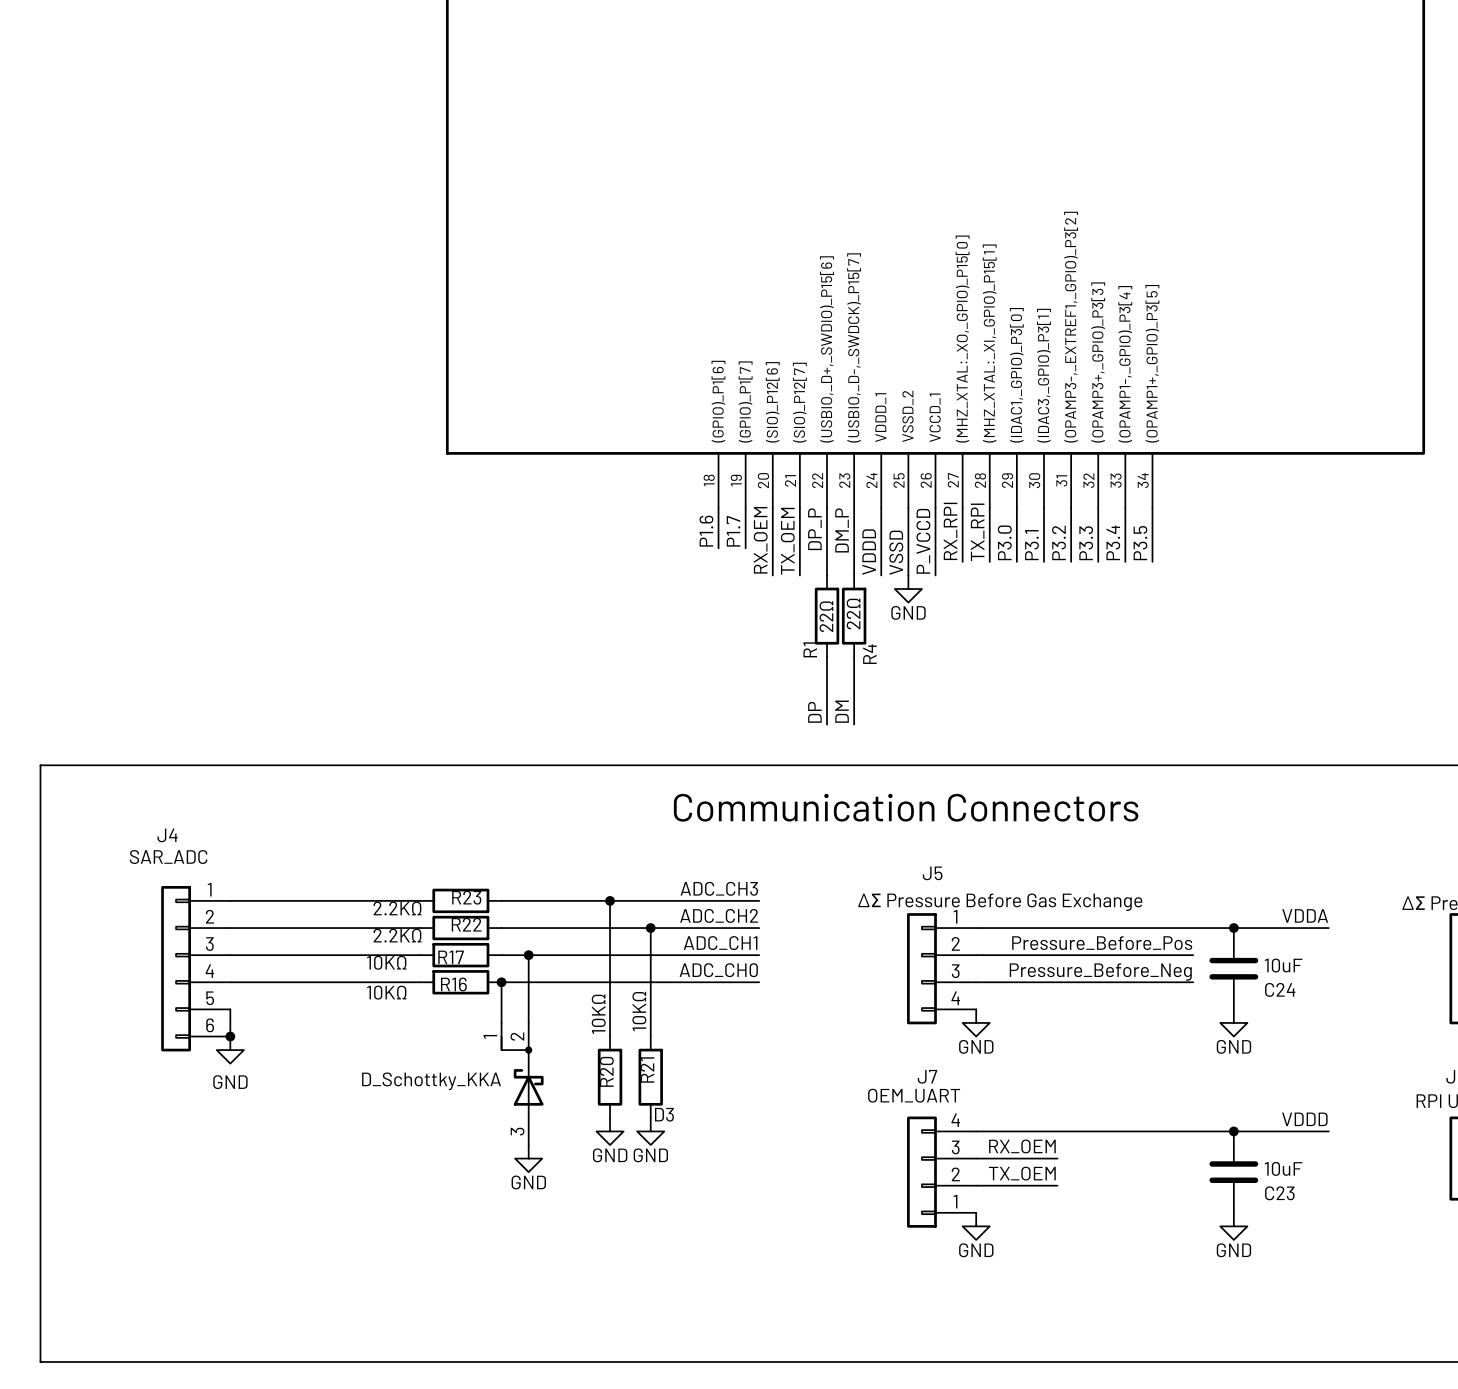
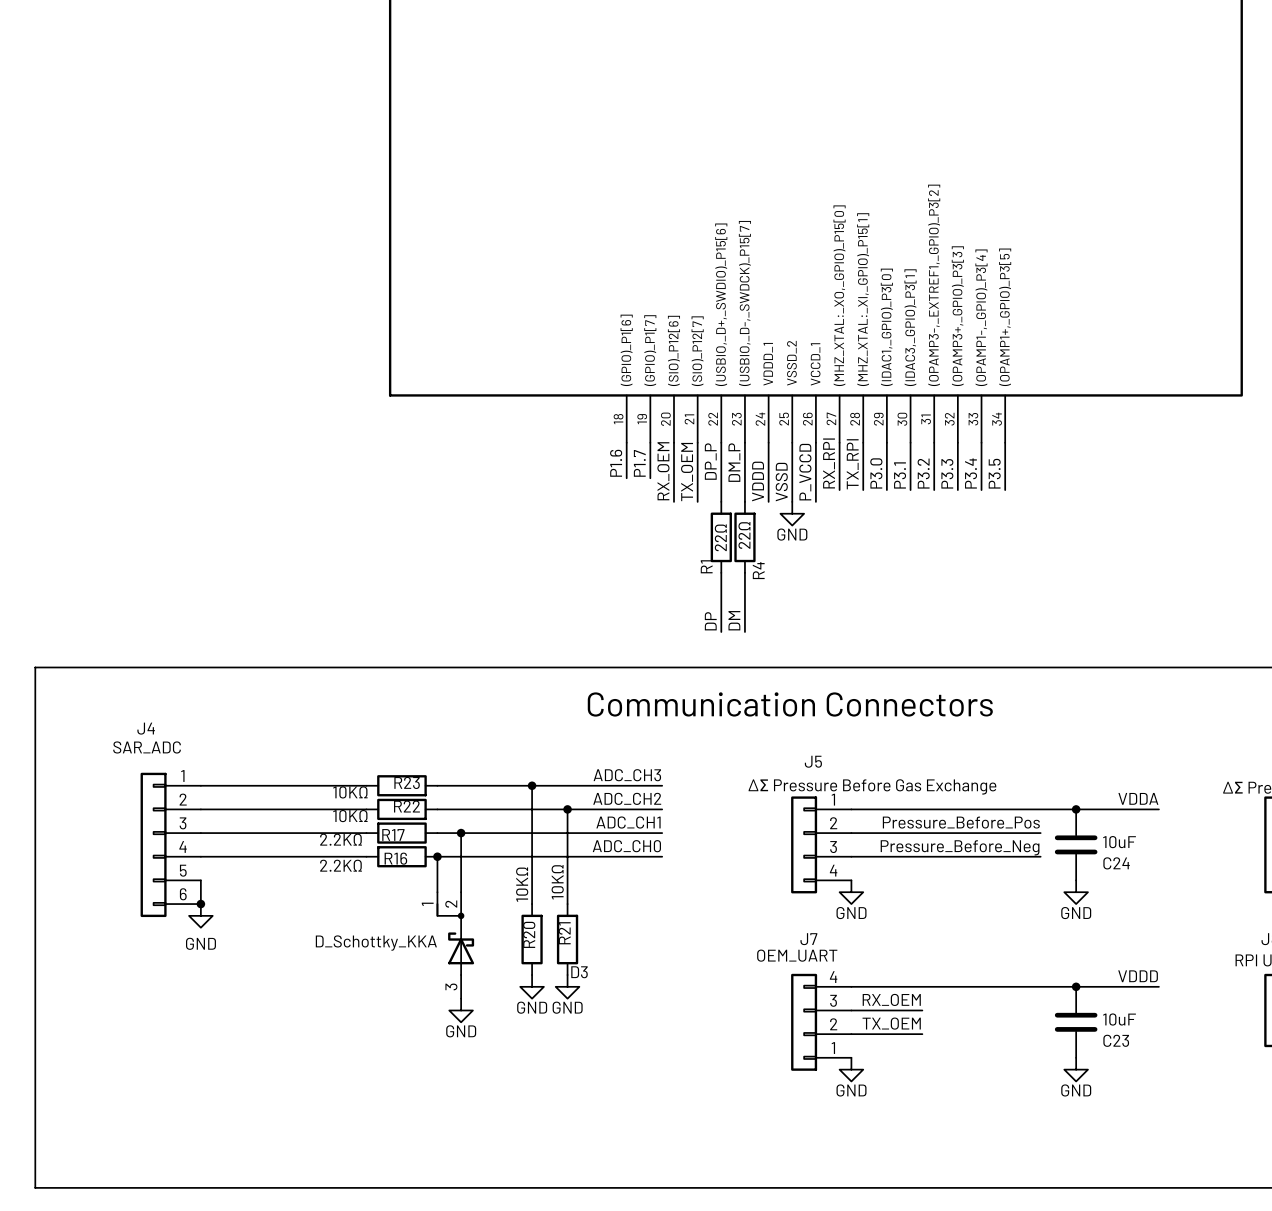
R23 value: 2.2KΩ (397, 908) -> 10KΩ (350, 792)
R22 value: 2.2KΩ (397, 935) -> 10KΩ (350, 816)
R17 value: 10KΩ (386, 962) -> 2.2KΩ (341, 839)
R16 value: 10KΩ (386, 992) -> 2.2KΩ (341, 865)

